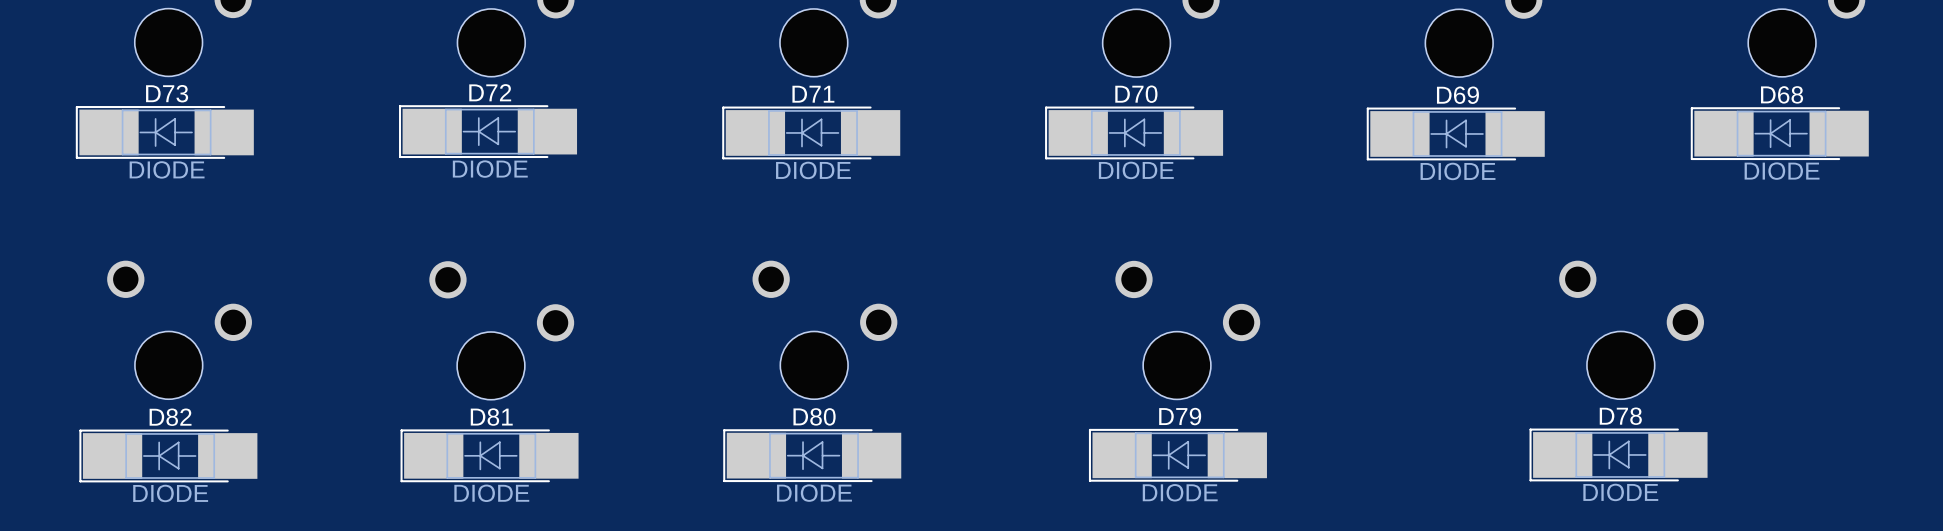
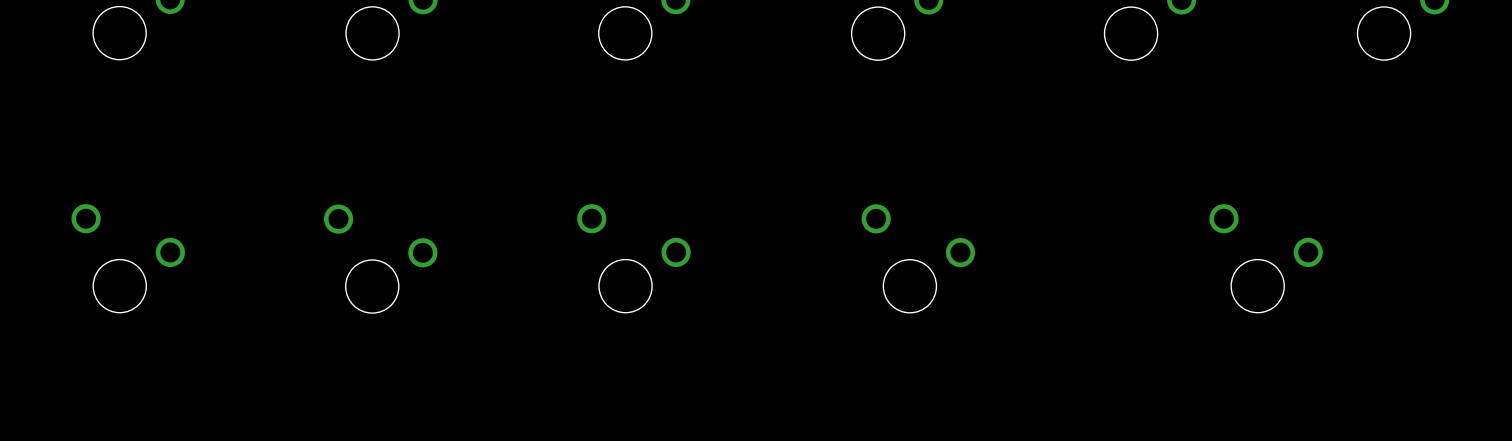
D72: DIODE (488, 131) -> none
D73: DIODE (164, 132) -> none
D71: DIODE (811, 132) -> none
D70: DIODE (1134, 132) -> none
D69: DIODE (1455, 133) -> none
D68: DIODE (1779, 133) -> none
D78: DIODE (1618, 454) -> none
D82: DIODE (168, 455) -> none
D81: DIODE (489, 455) -> none
D80: DIODE (812, 455) -> none
D79: DIODE (1177, 455) -> none

